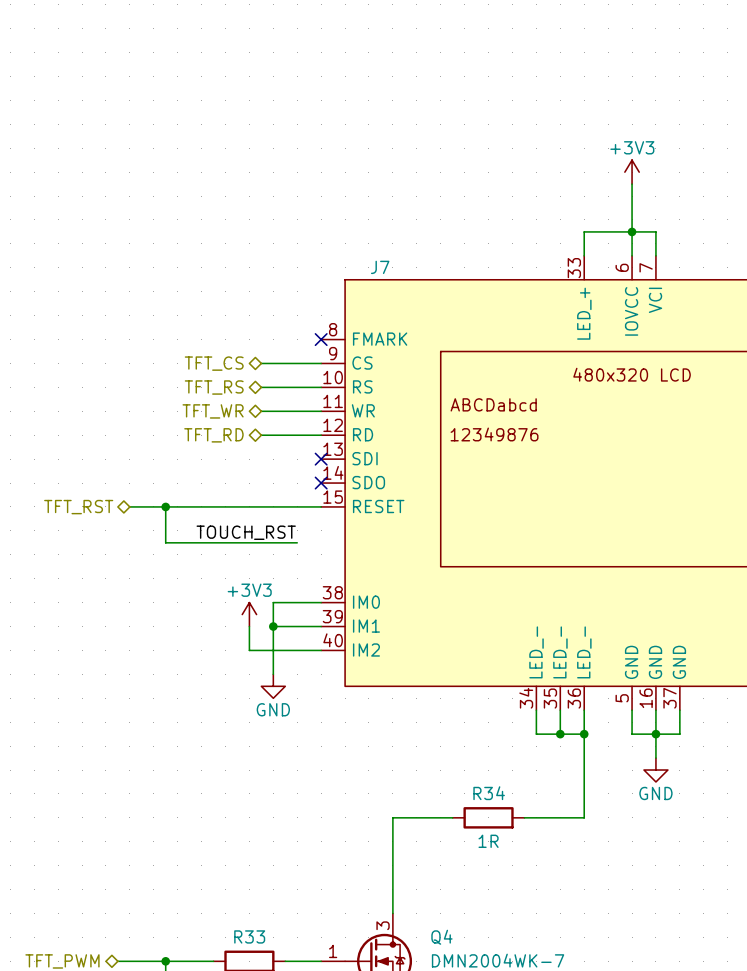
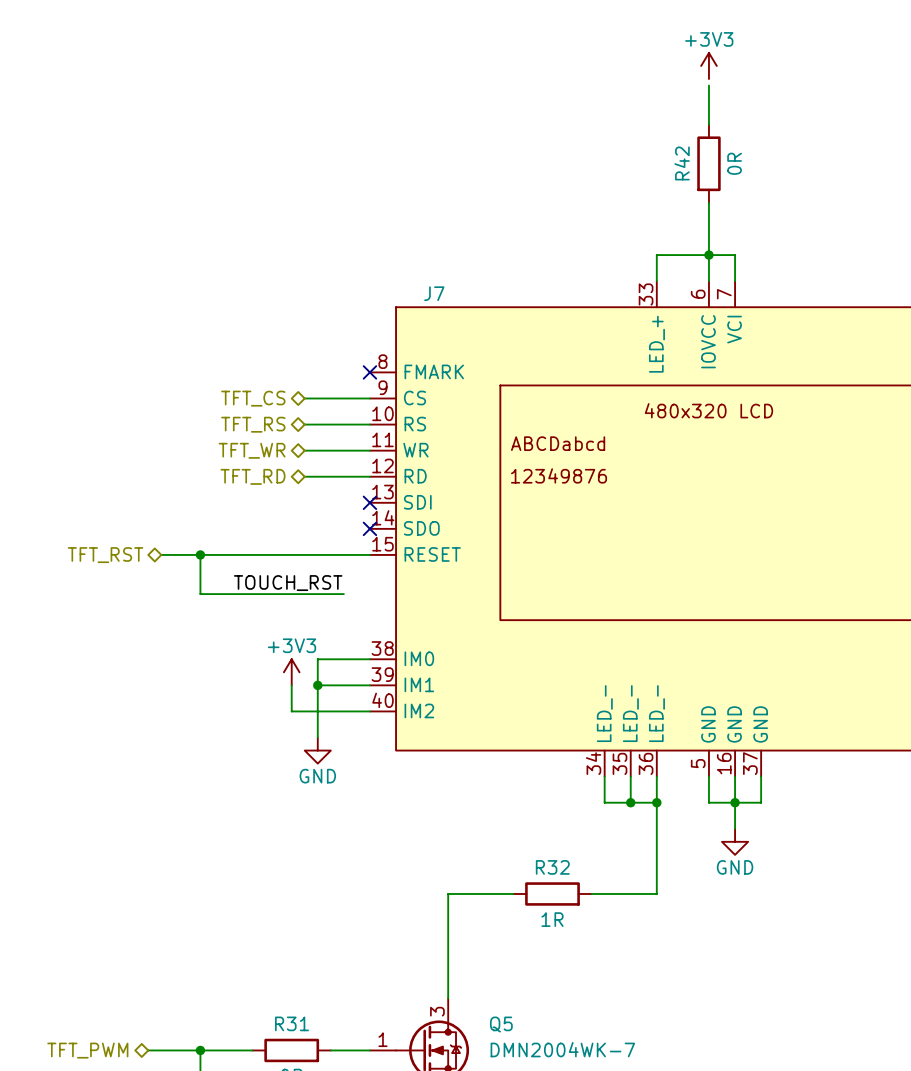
wire: none -> (708, 85) (708, 124)
R42: none -> 0R (708, 163)
power symbol position: +3V3 (632, 172) -> +3V3 (708, 65)
R34 name: R34 (489, 793) -> R32 (552, 867)
R33 name: R33 (249, 936) -> R31 (292, 1023)
Q4 name: Q4 (441, 937) -> Q5 (501, 1024)

